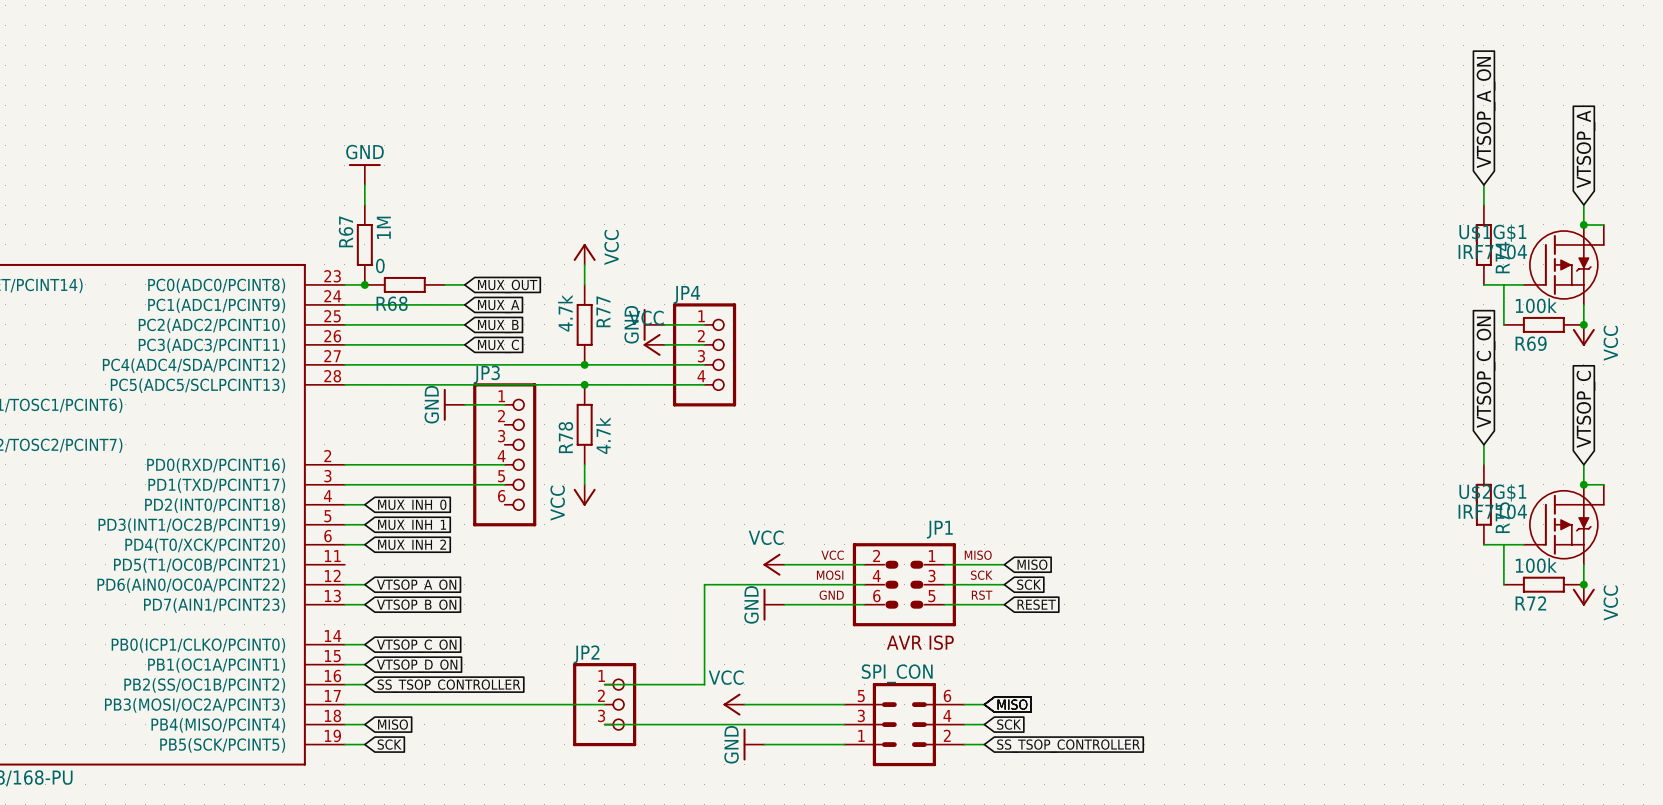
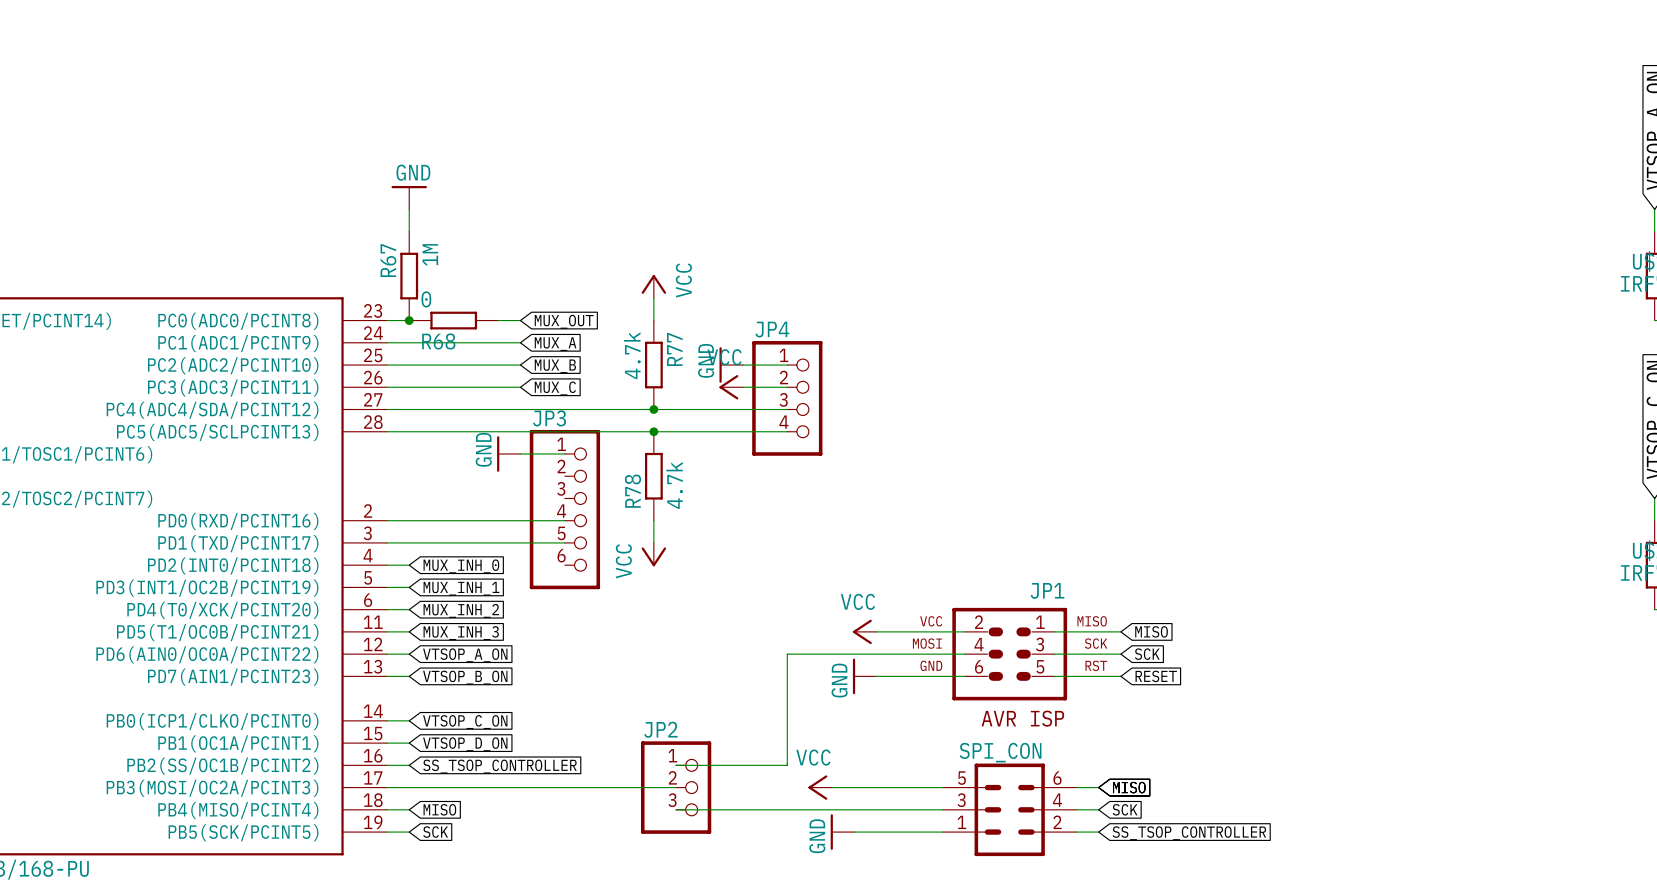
wire: none -> (387, 631) (409, 631)
global label: none -> MUX_INH_3 (461, 633)

